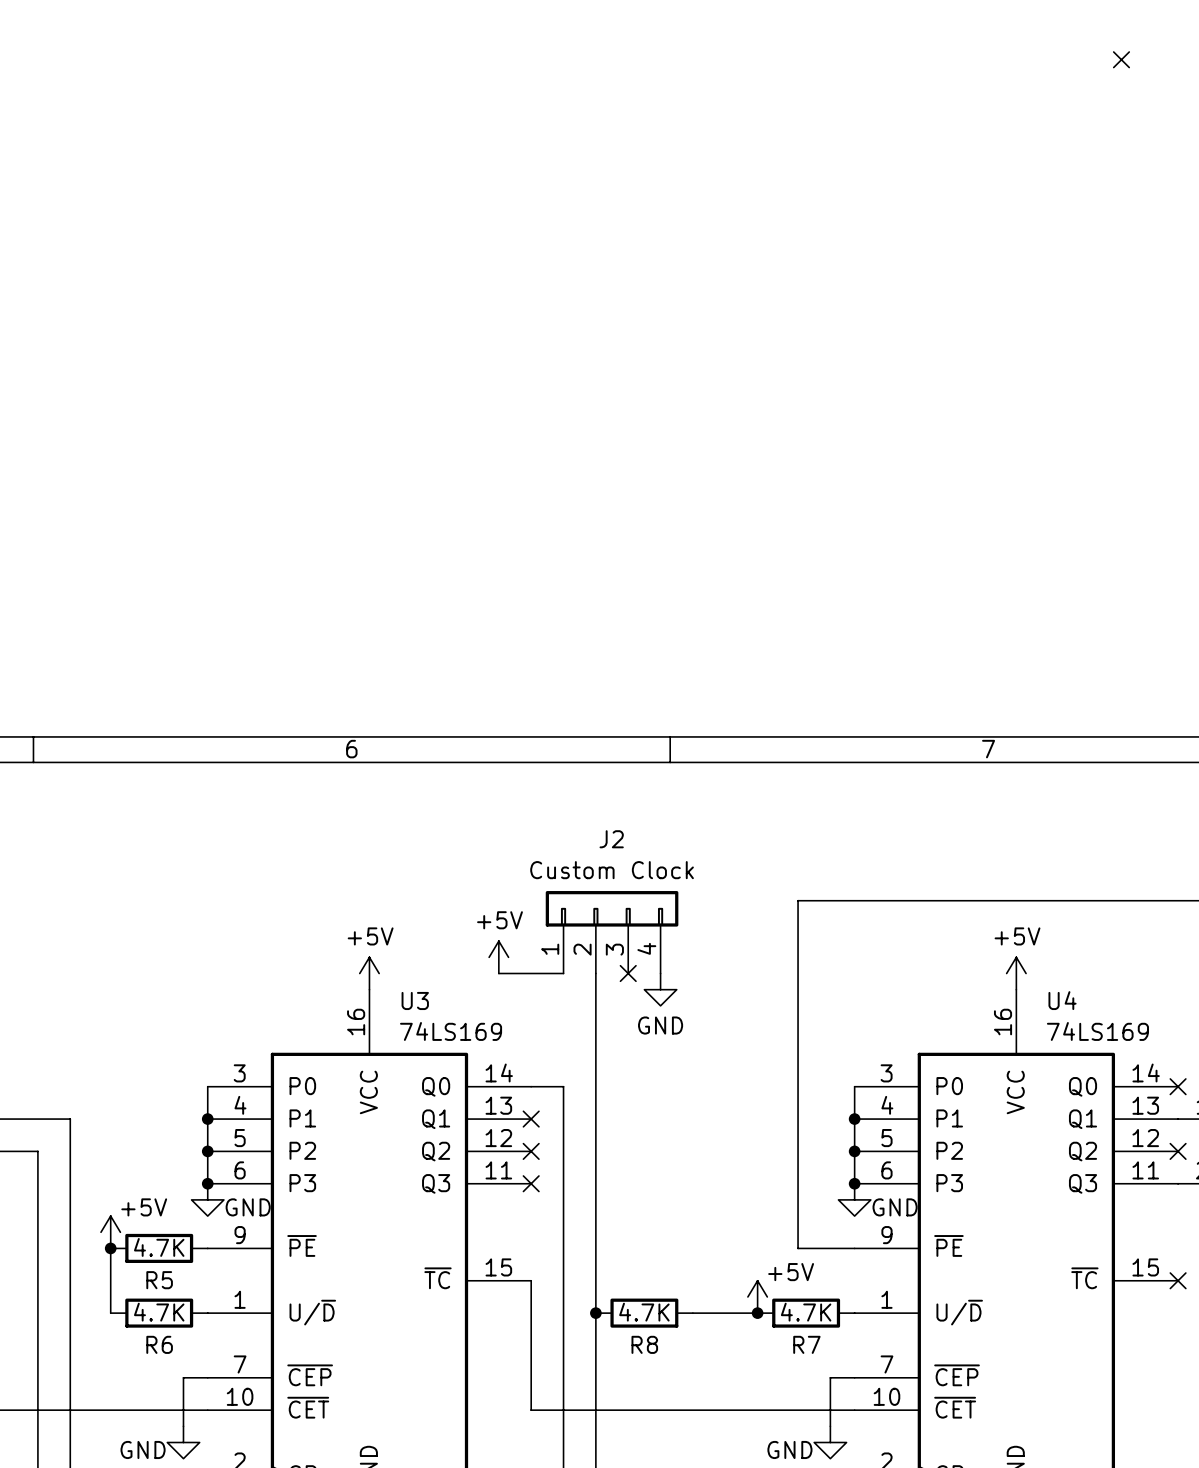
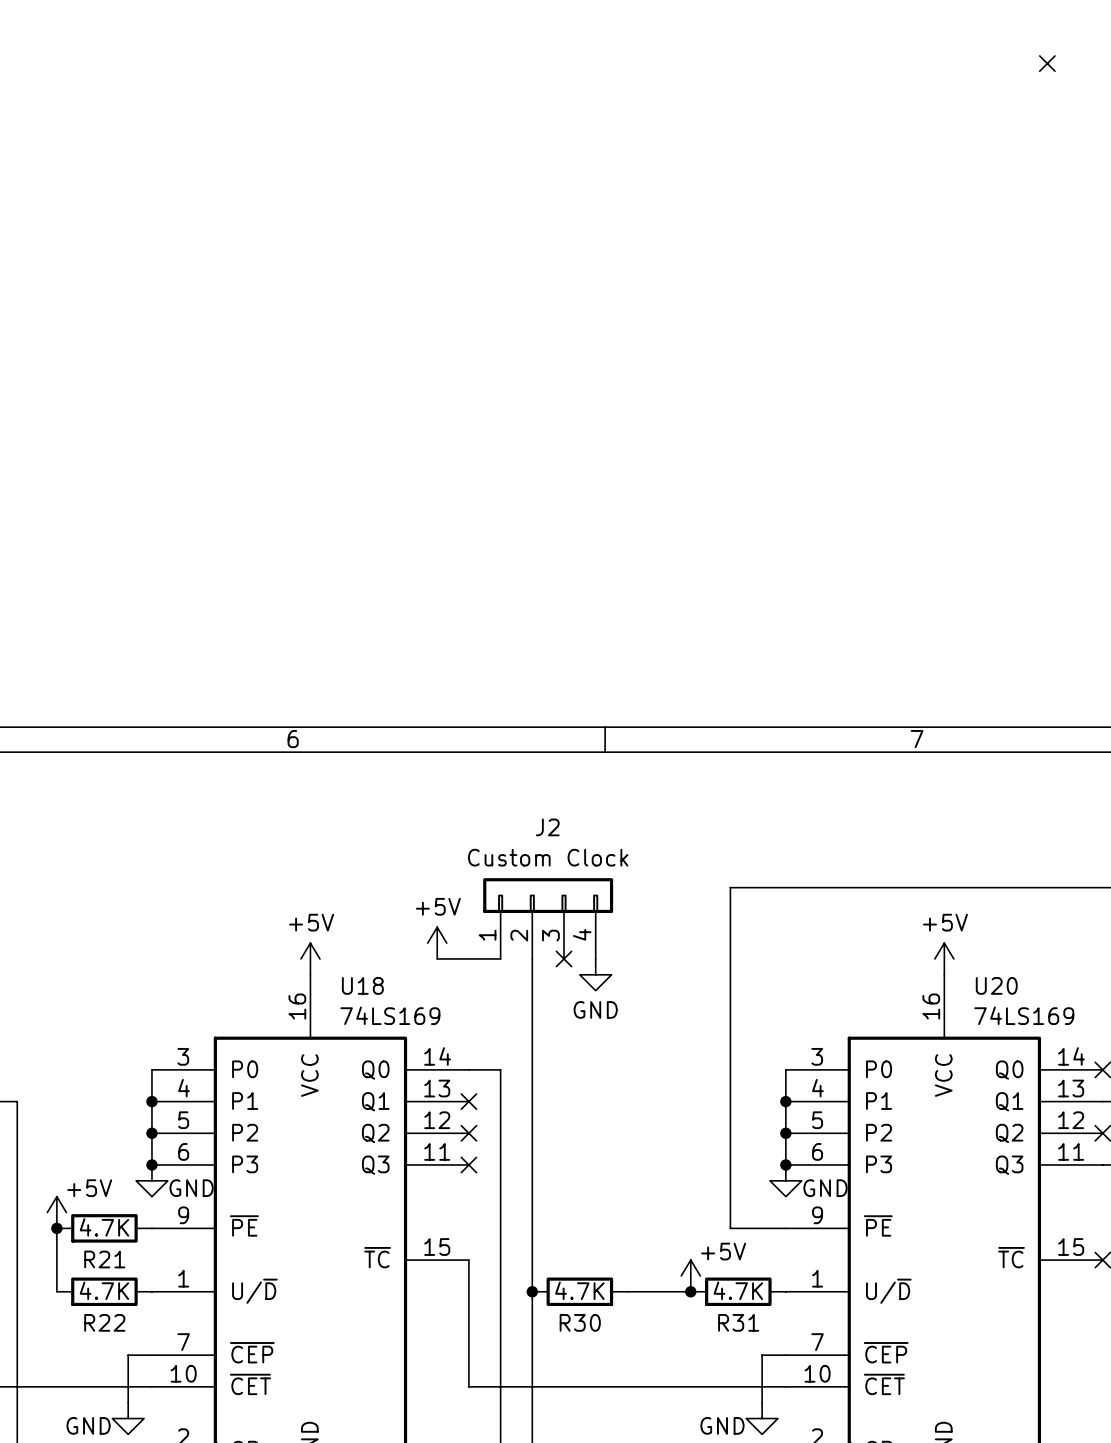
U3 name: U3 (415, 1000) -> U18 (362, 985)
U4 name: U4 (1062, 1000) -> U20 (996, 985)
R5 name: R5 (159, 1280) -> R21 (104, 1259)
R6 name: R6 (159, 1344) -> R22 (104, 1322)
R8 name: R8 (644, 1344) -> R30 (580, 1322)
R7 name: R7 (806, 1344) -> R31 (738, 1322)

